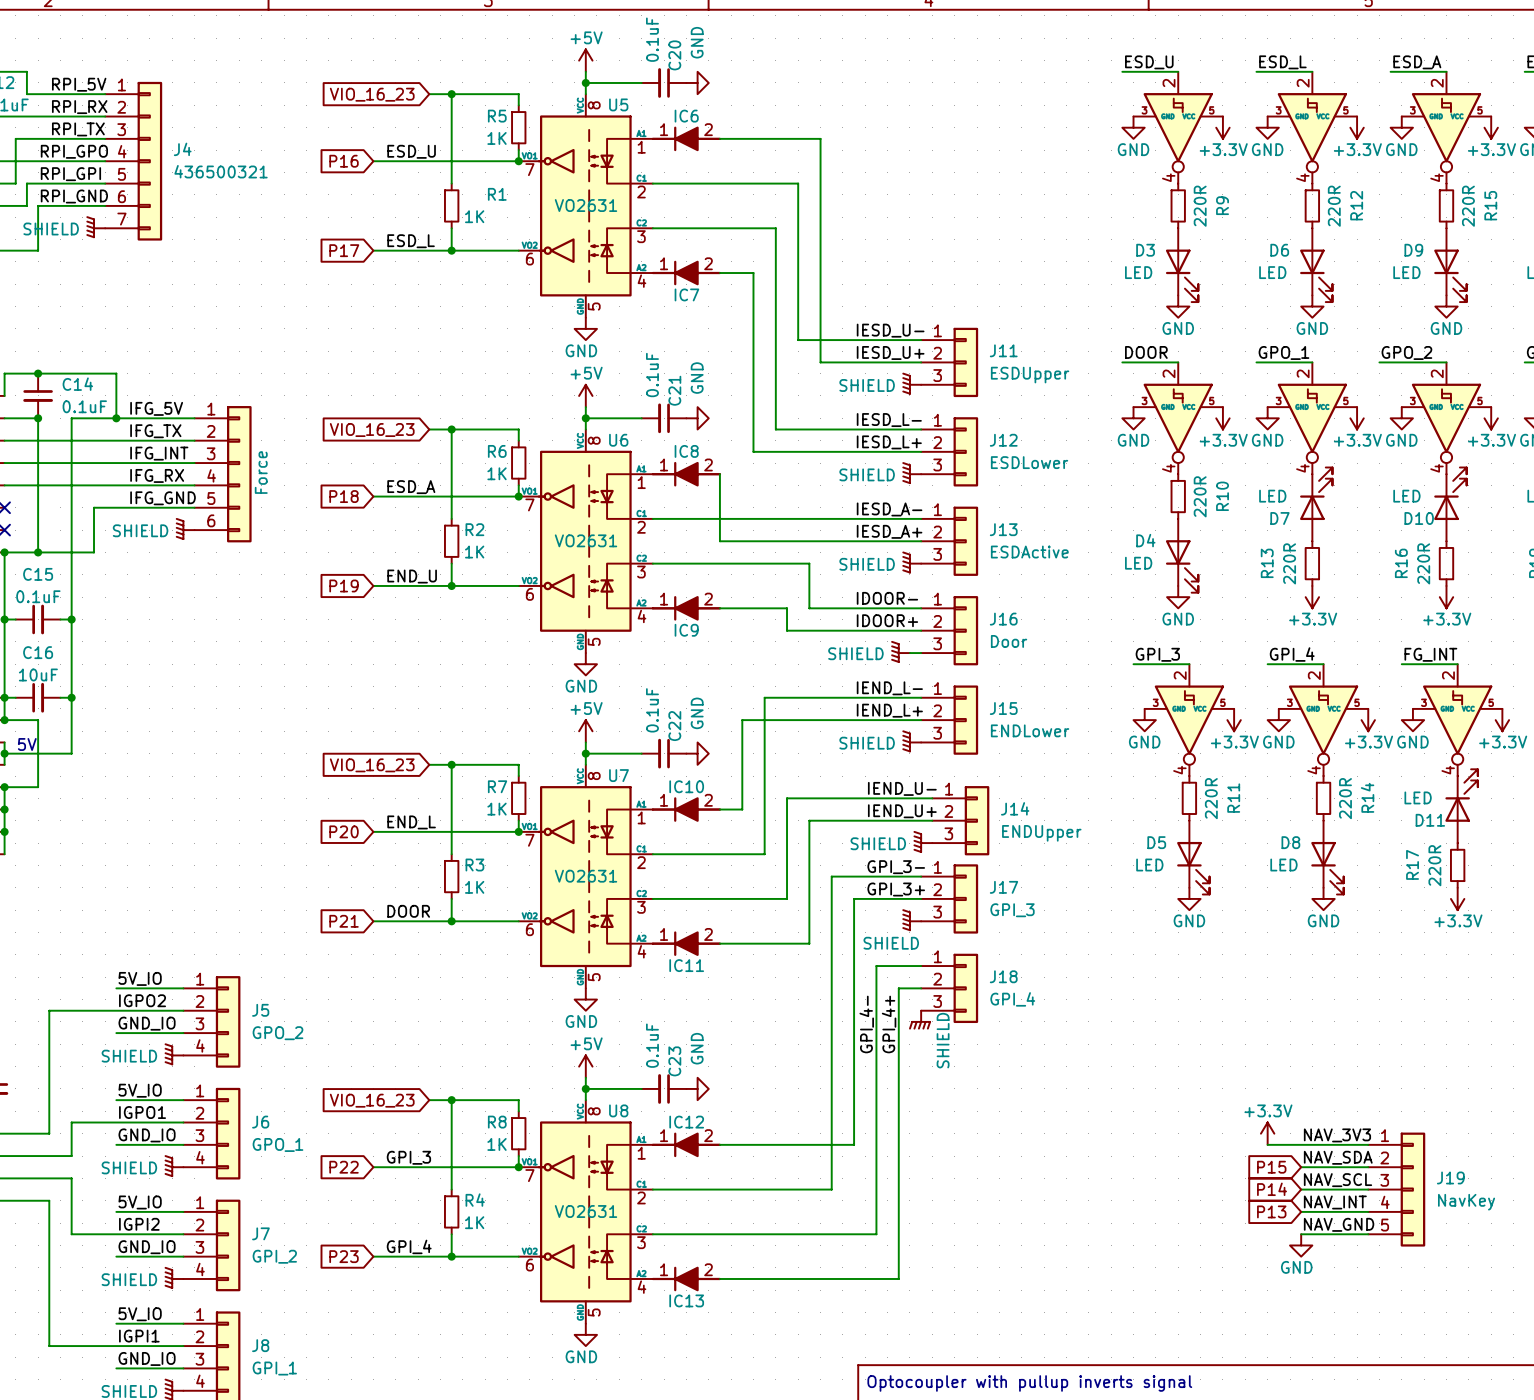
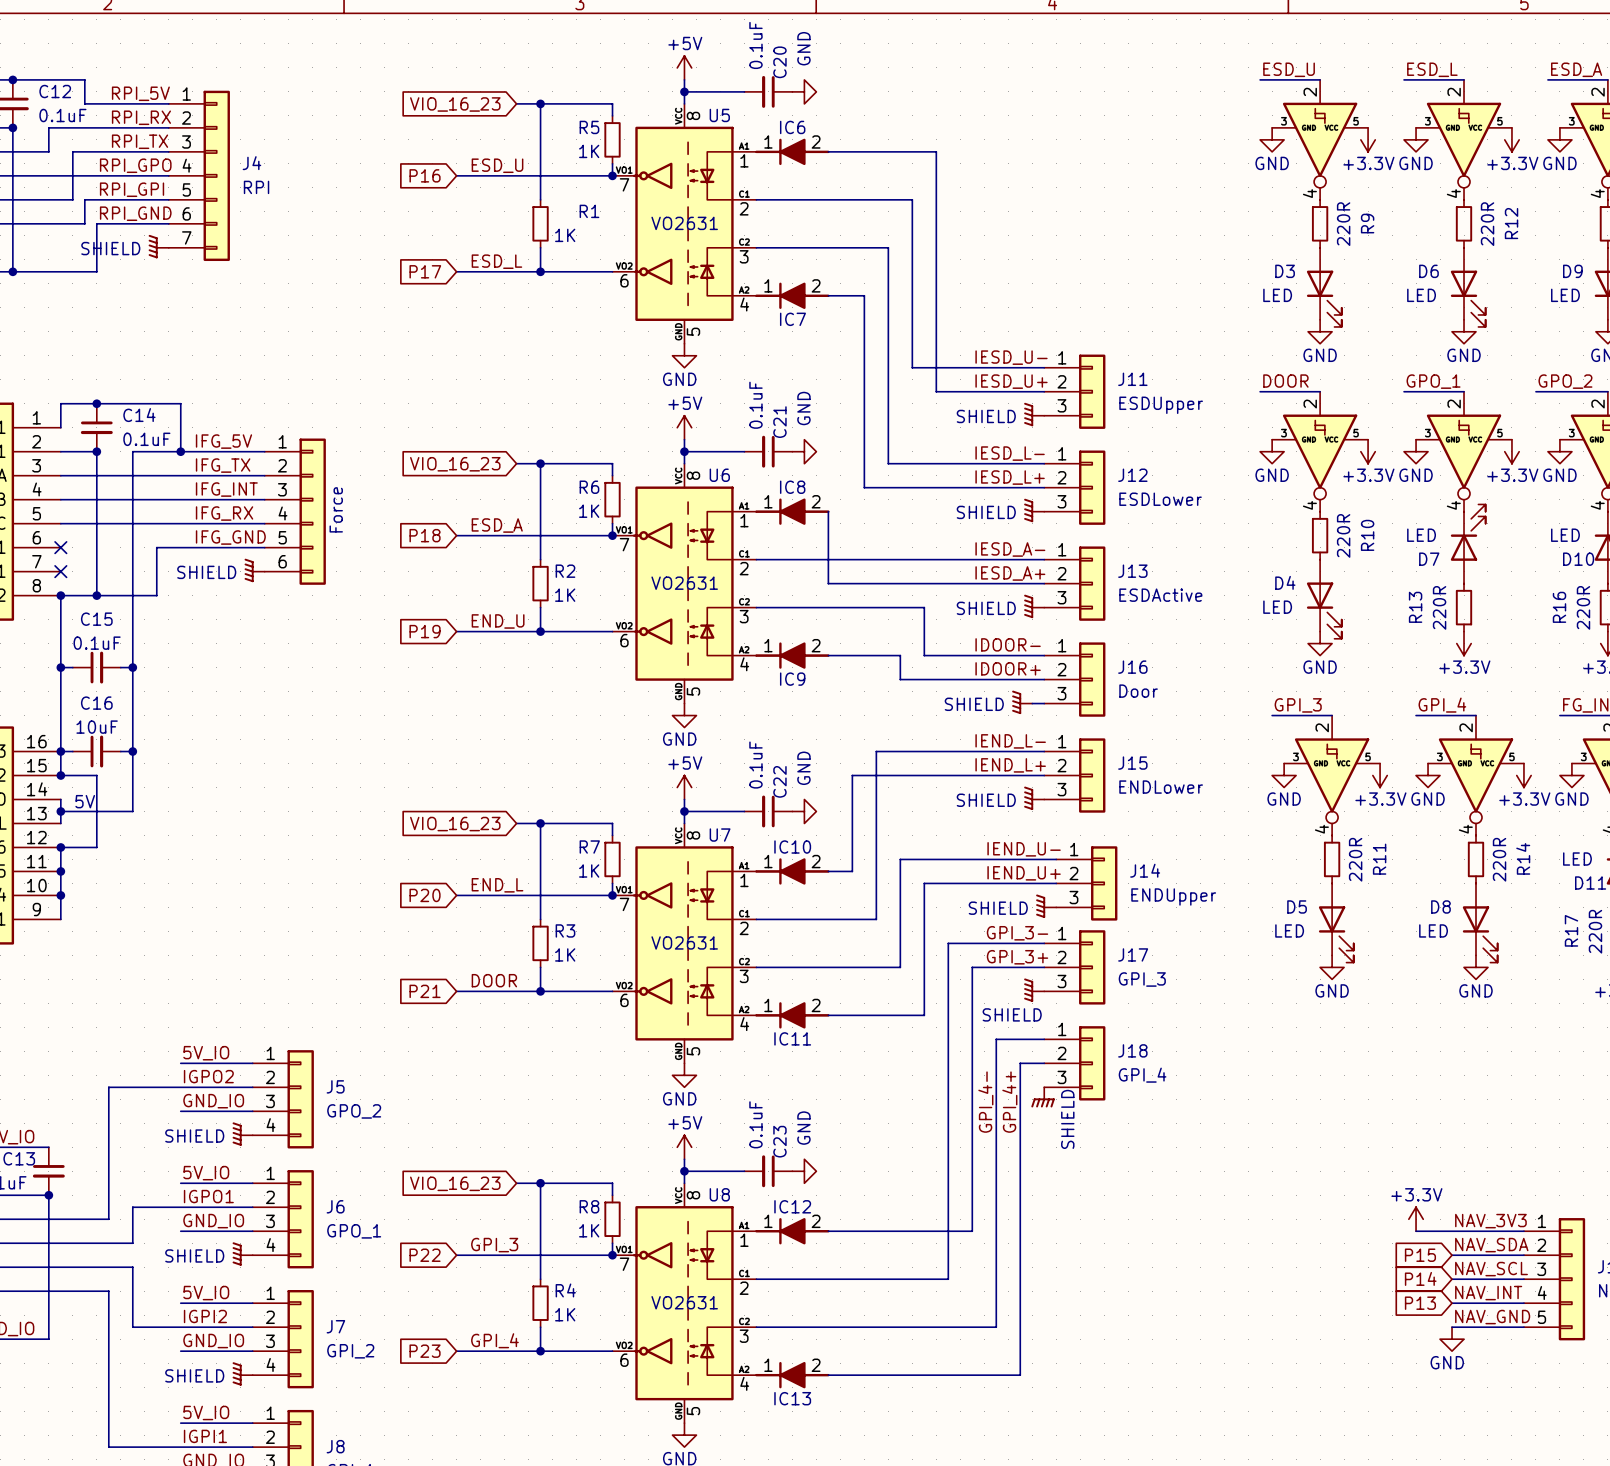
J4 value: 436500321 (221, 171) -> RPI (256, 187)

